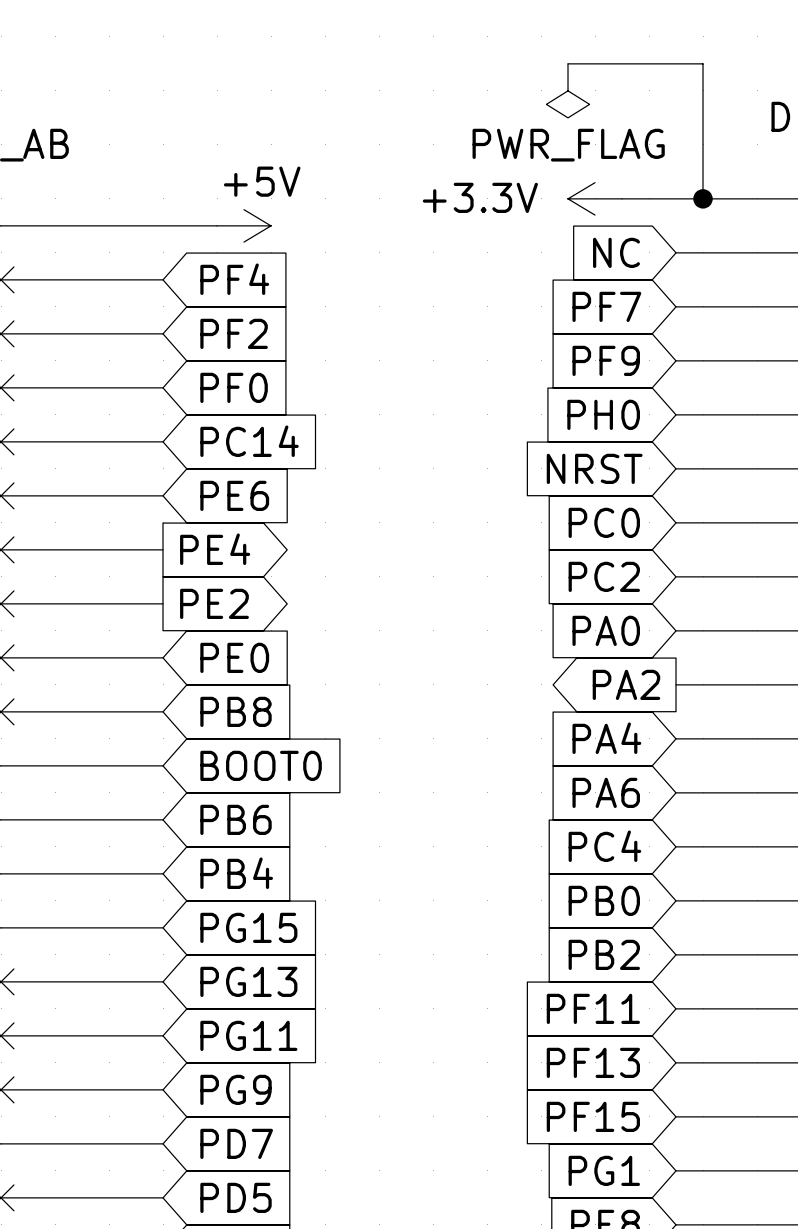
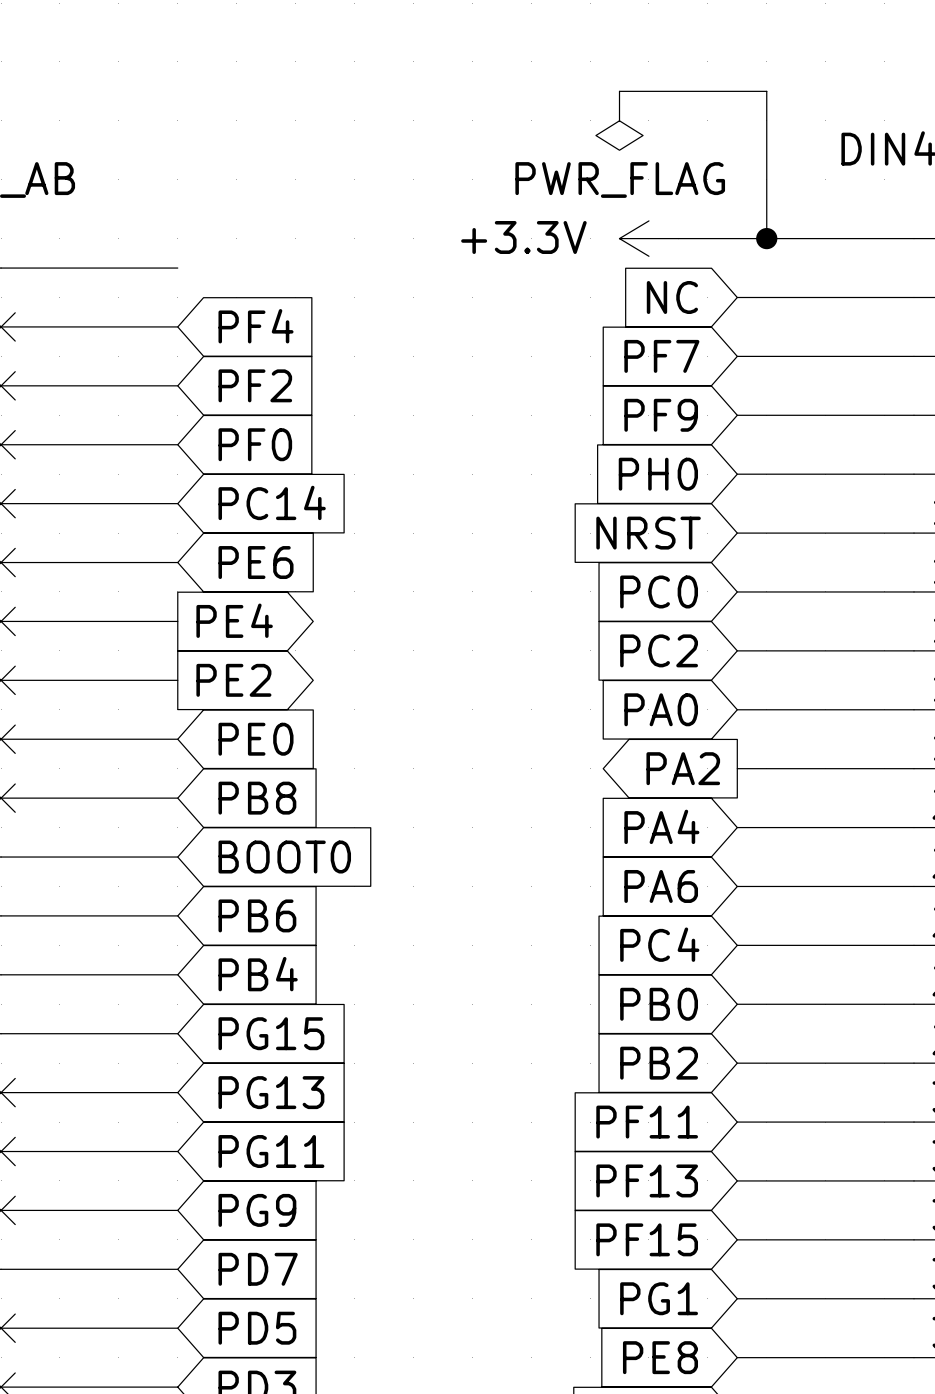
wire: (163, 225) (217, 225) -> none
power symbol: +5V (244, 225) -> none

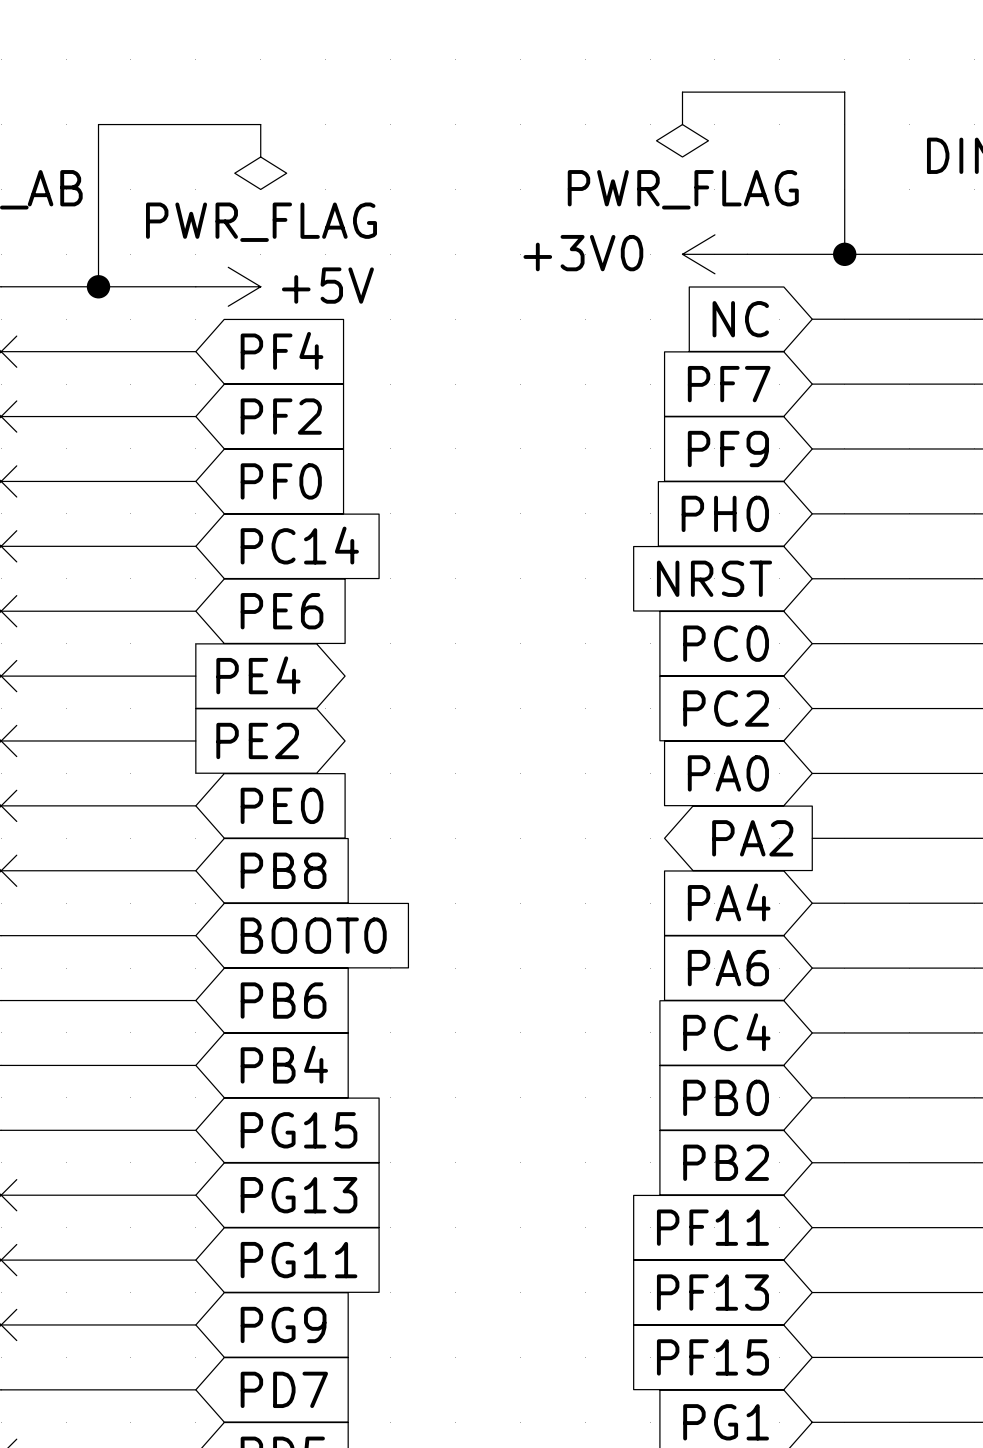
wire: none -> (260, 124) (98, 124) (98, 286)
power symbol: none -> PWR_FLAG (260, 157)
power symbol: +3.3V (648, 238) -> +3V0 (714, 254)
junction: none -> (98, 286)
power symbol: none -> +5V (228, 286)

